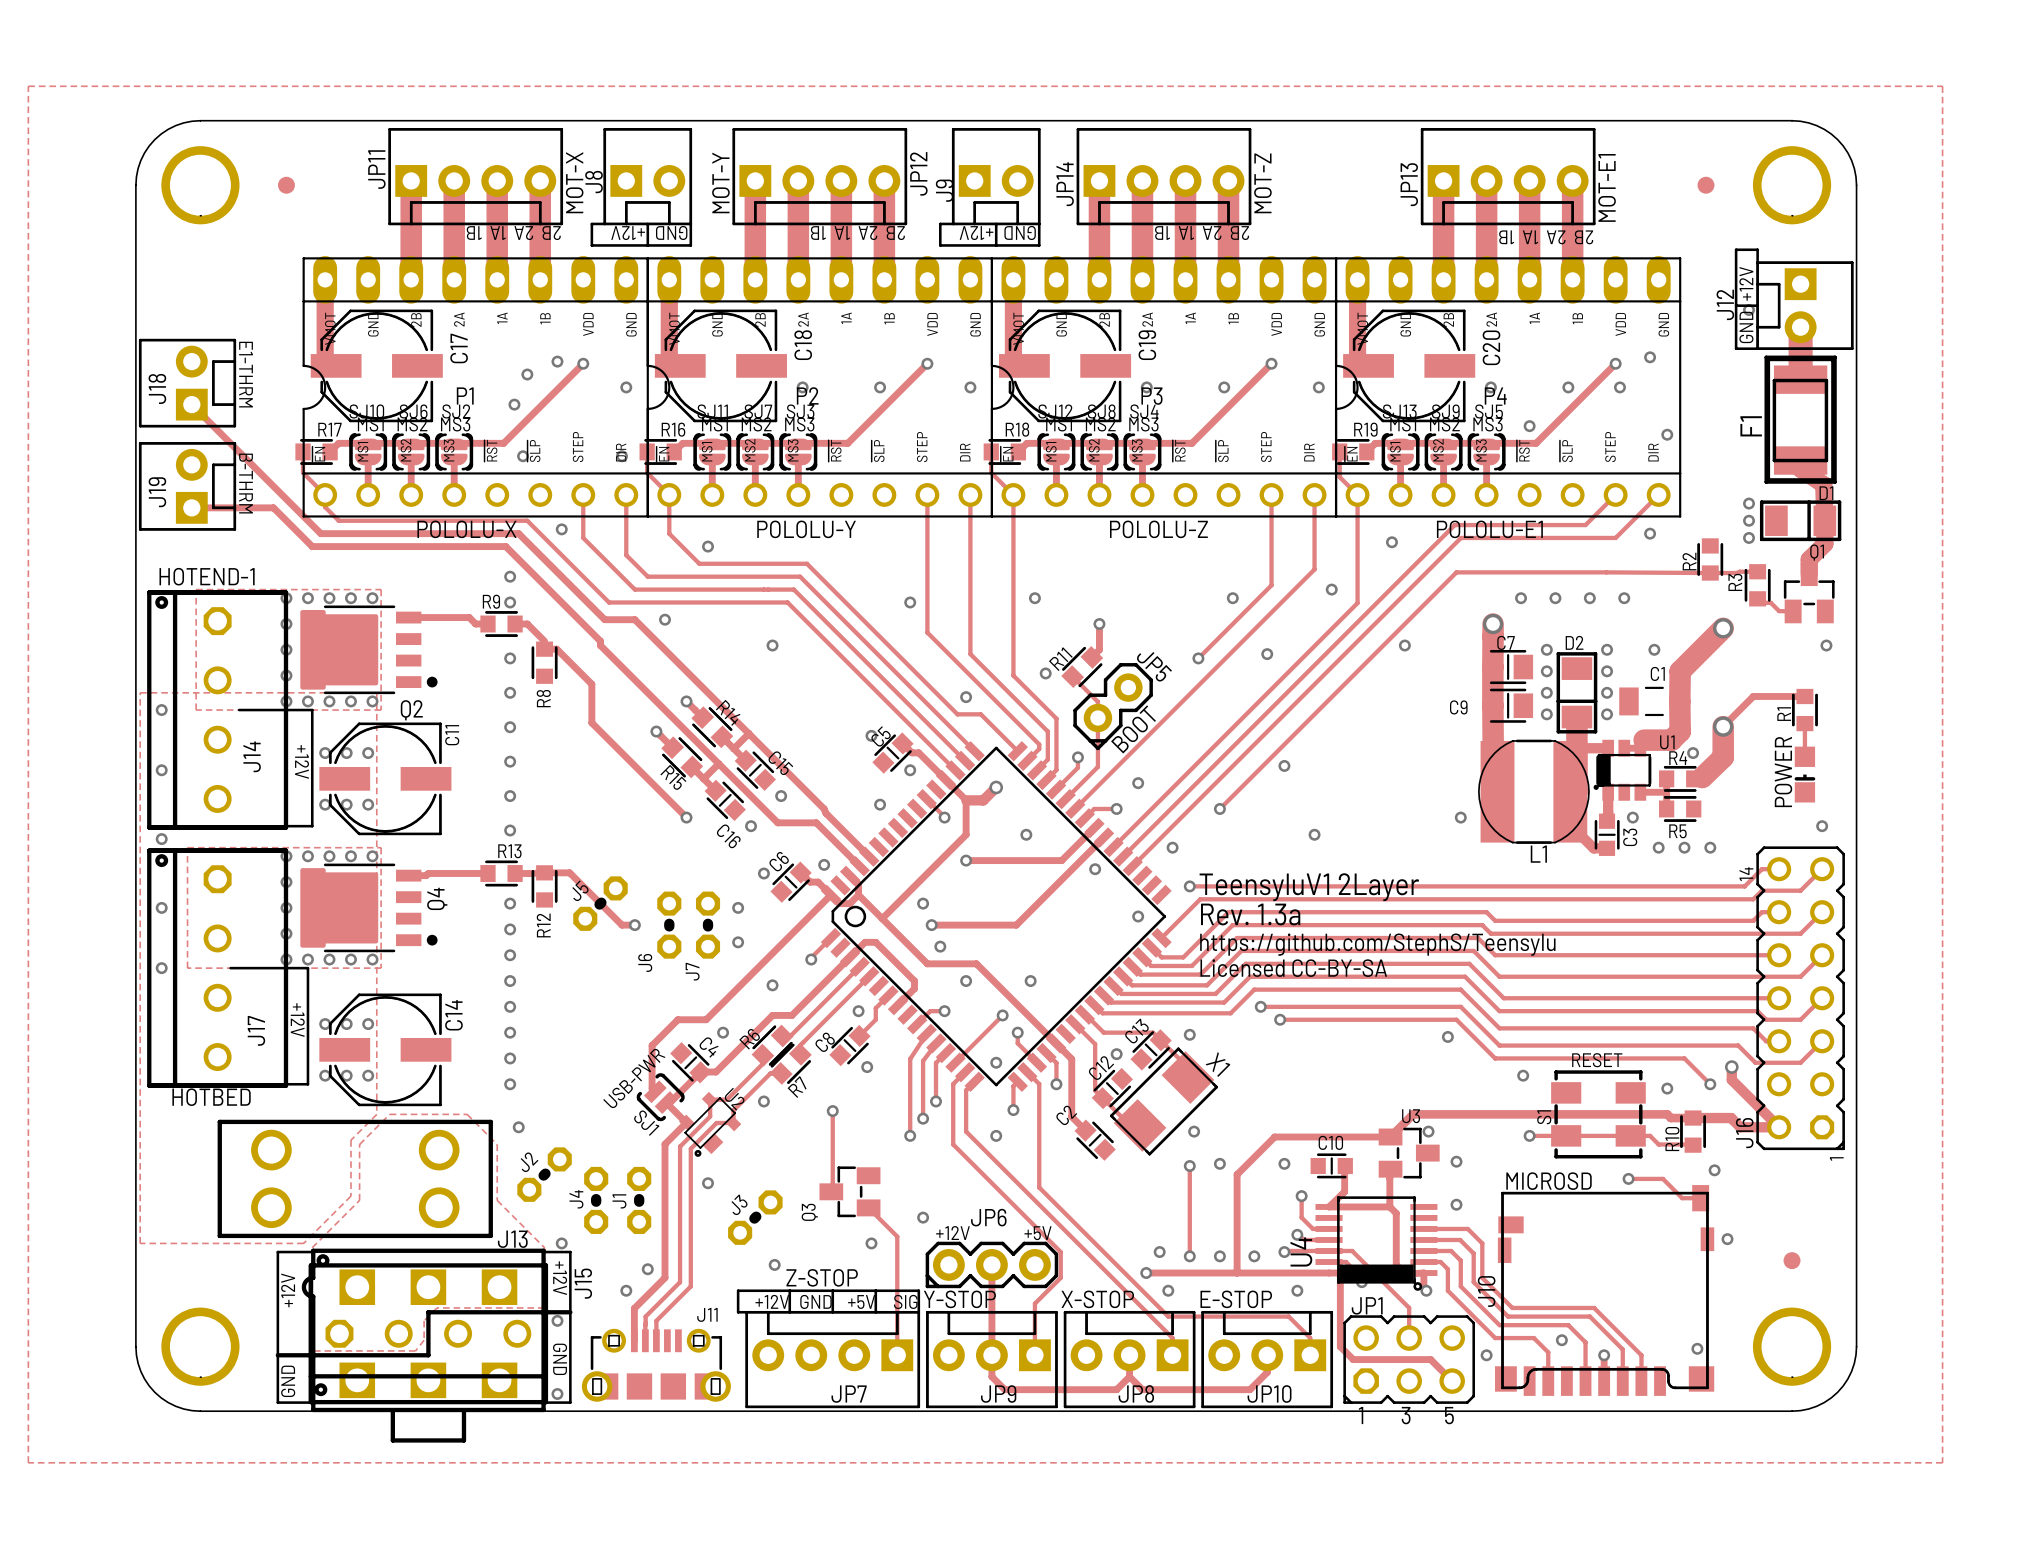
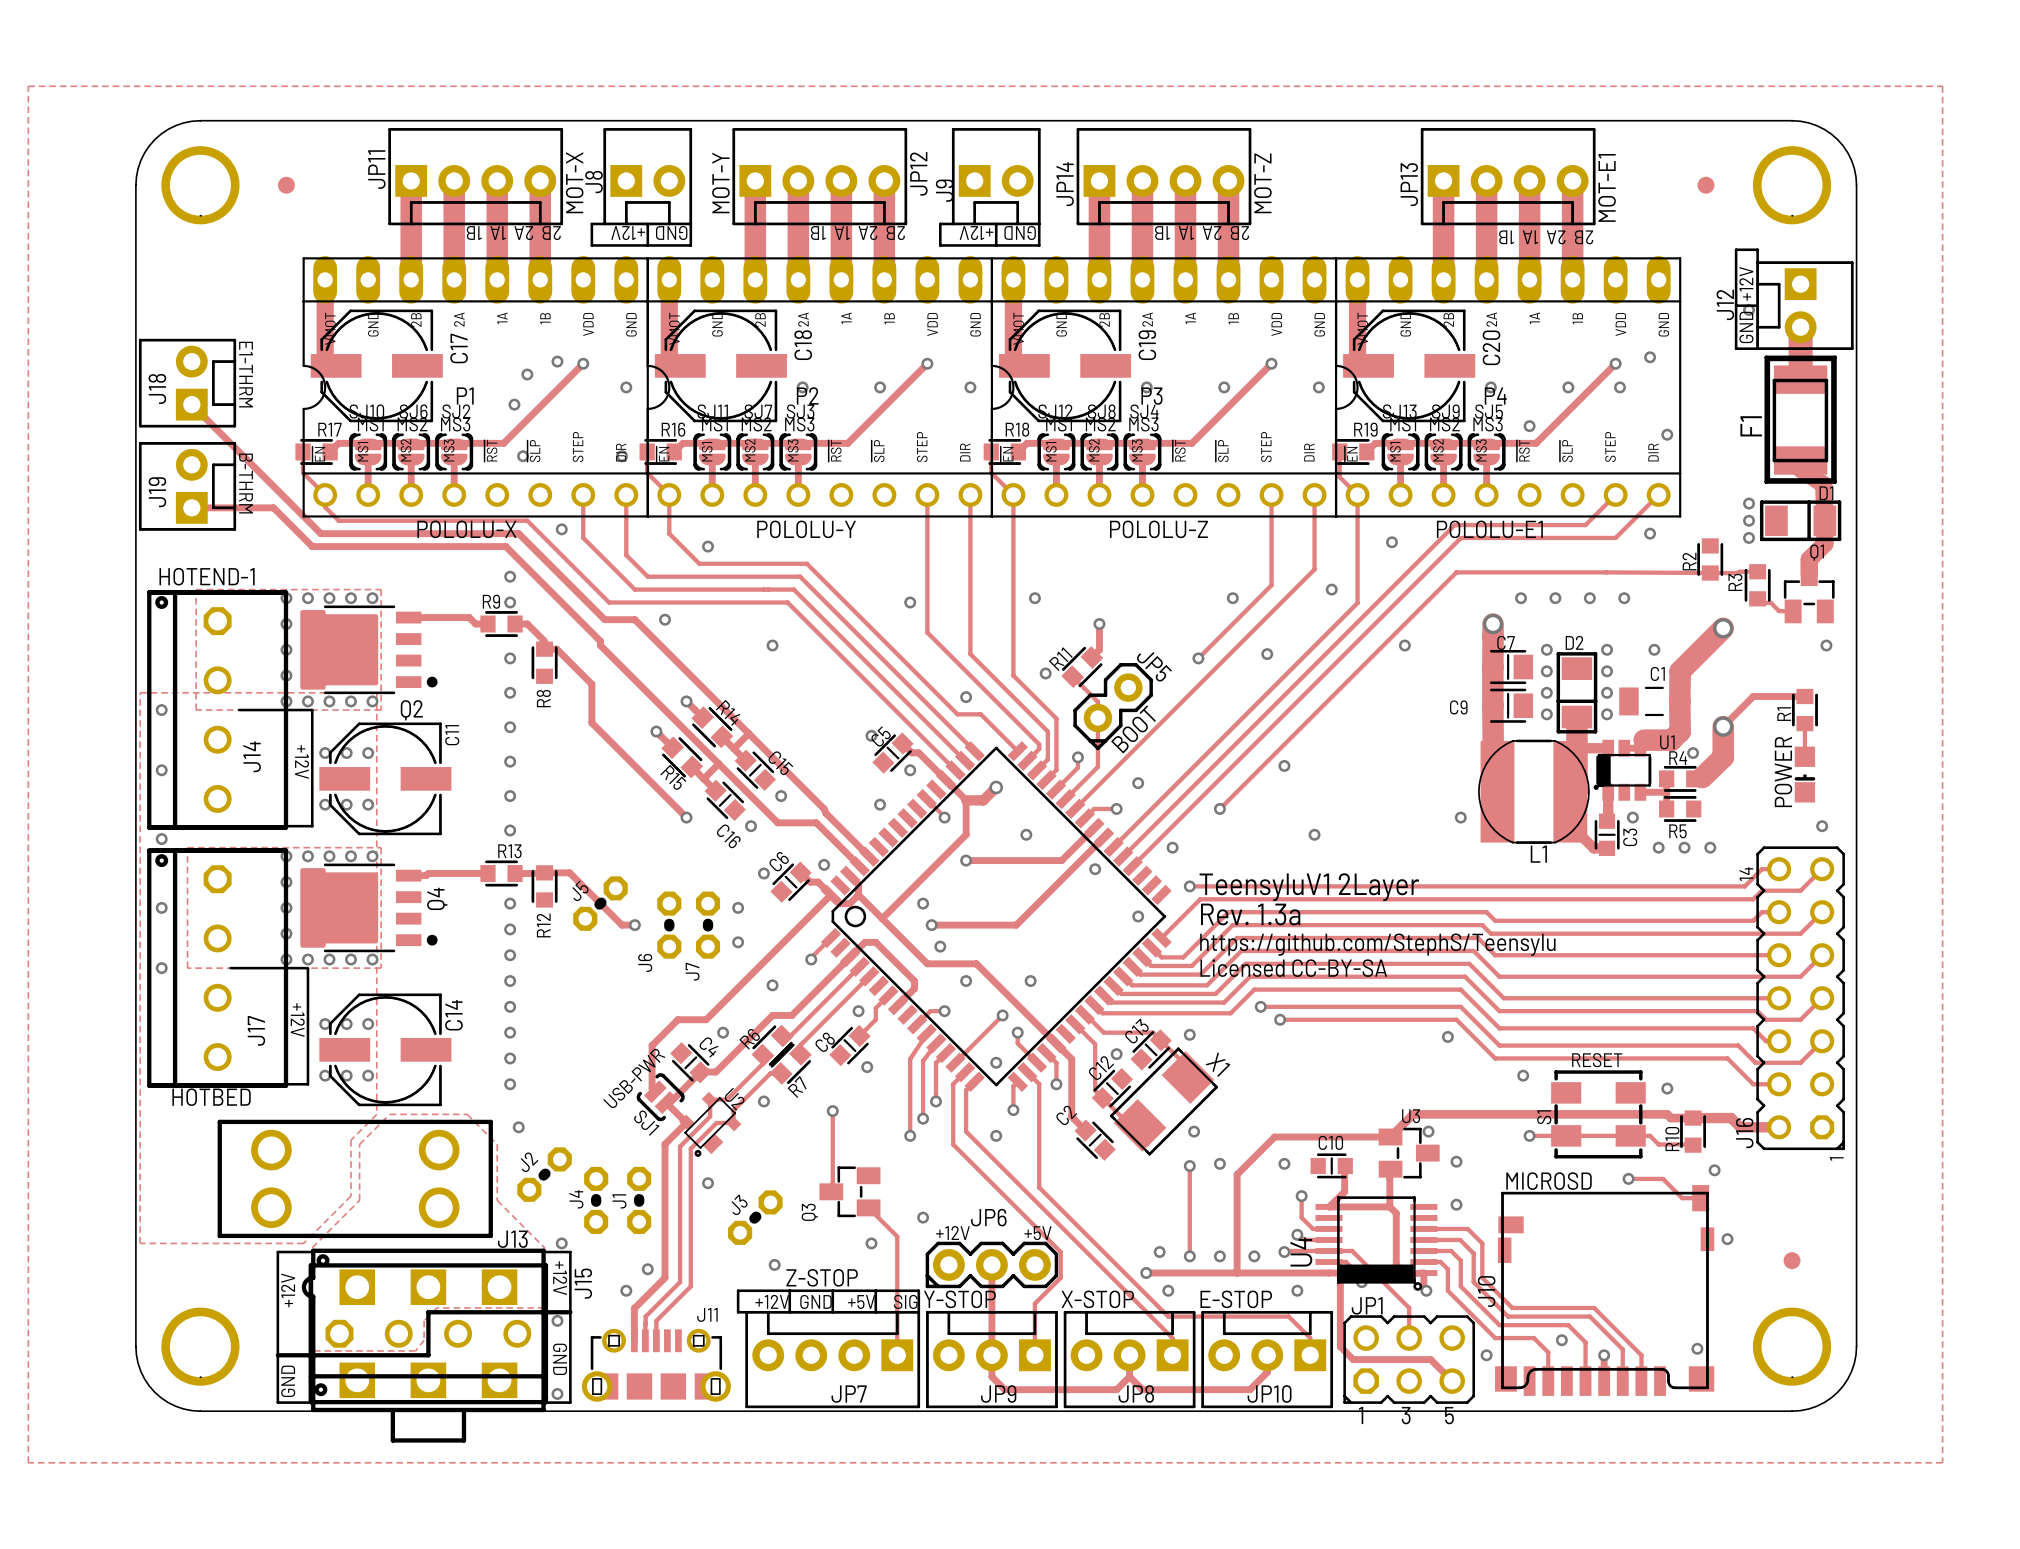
track: (1684, 1058) (1710, 1084) -> (1684, 1058) (1727, 1058) (1753, 1084) (1779, 1084)
track: (1731, 1067) (1731, 1079) (1779, 1127) -> none
via: (1731, 1067) -> none
via: (1710, 1084) -> none

